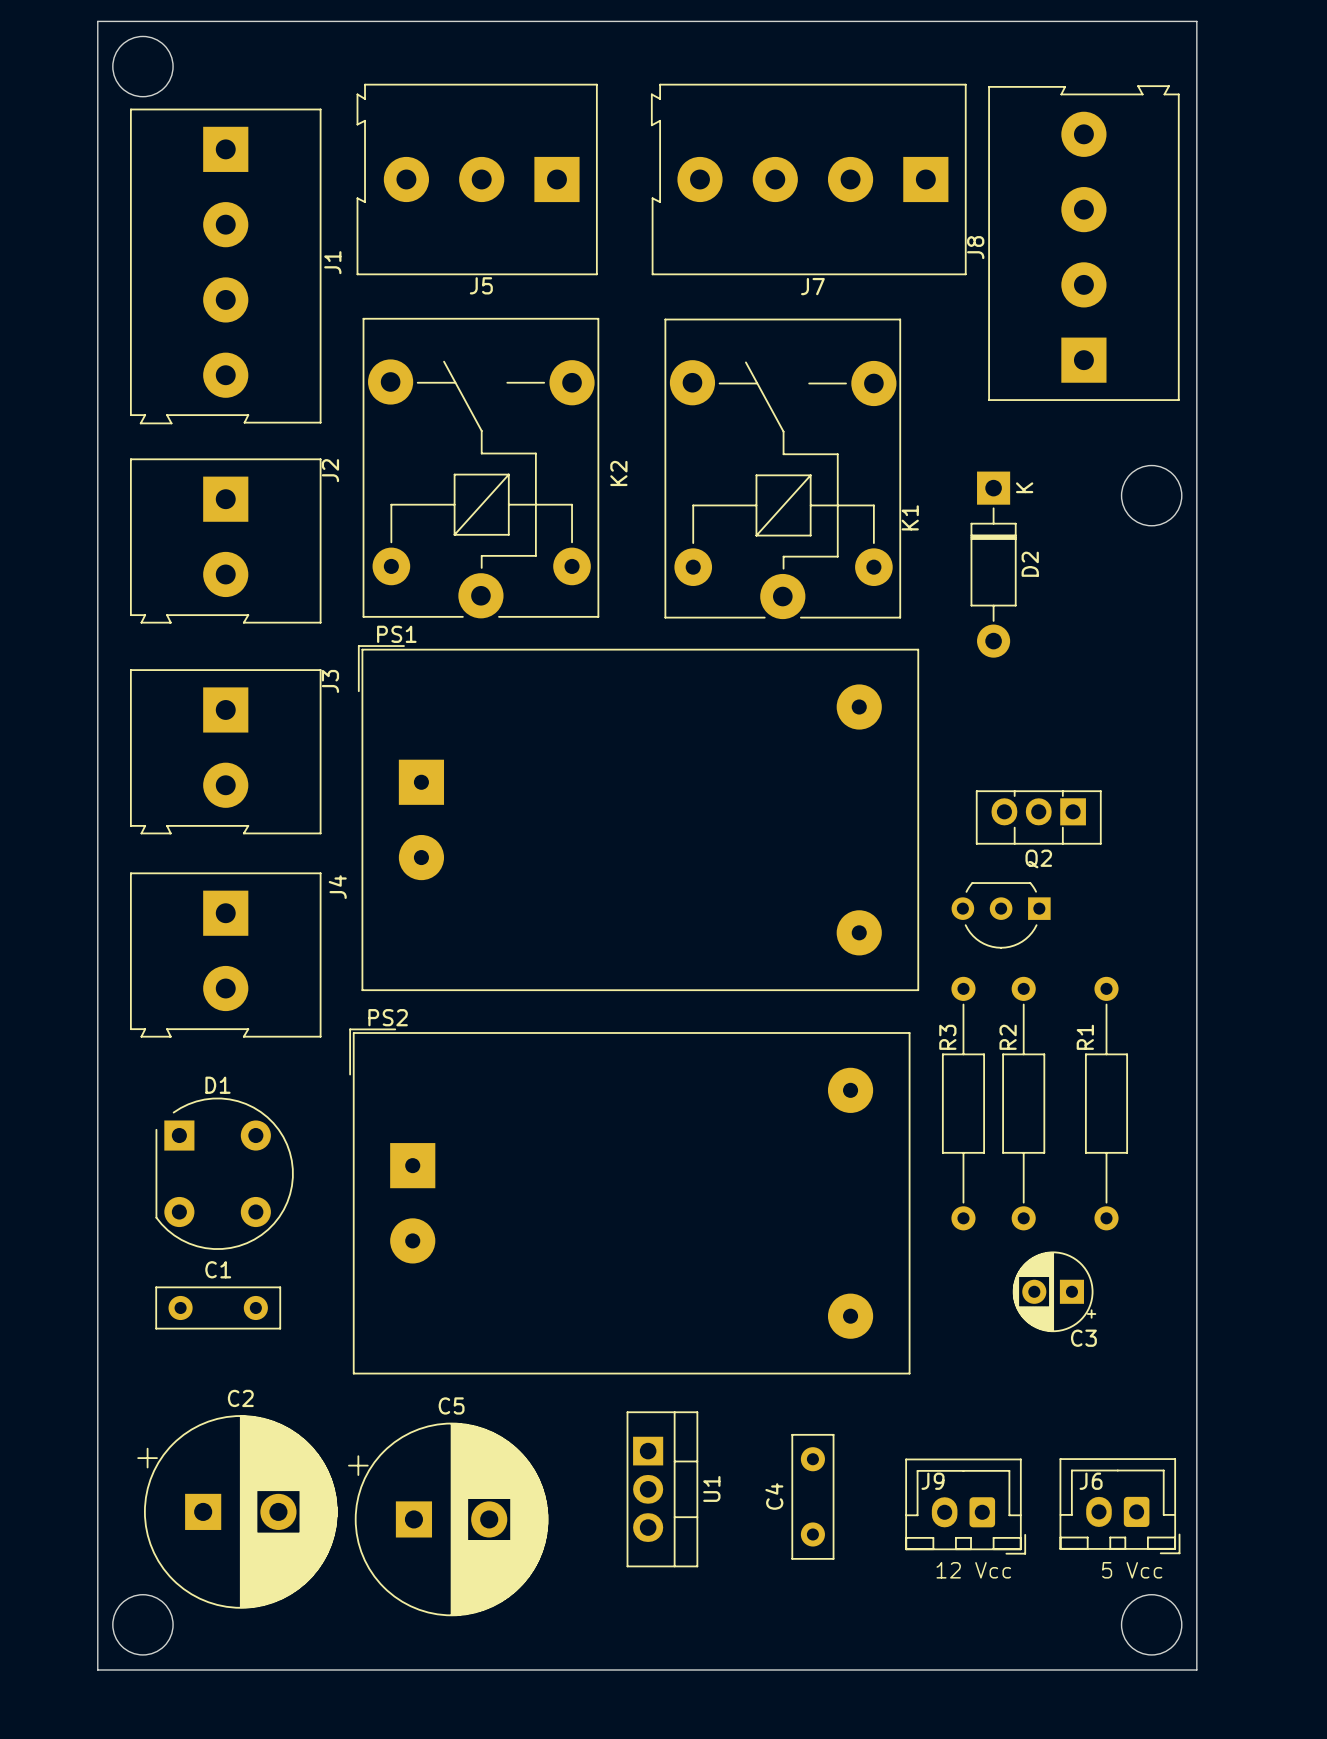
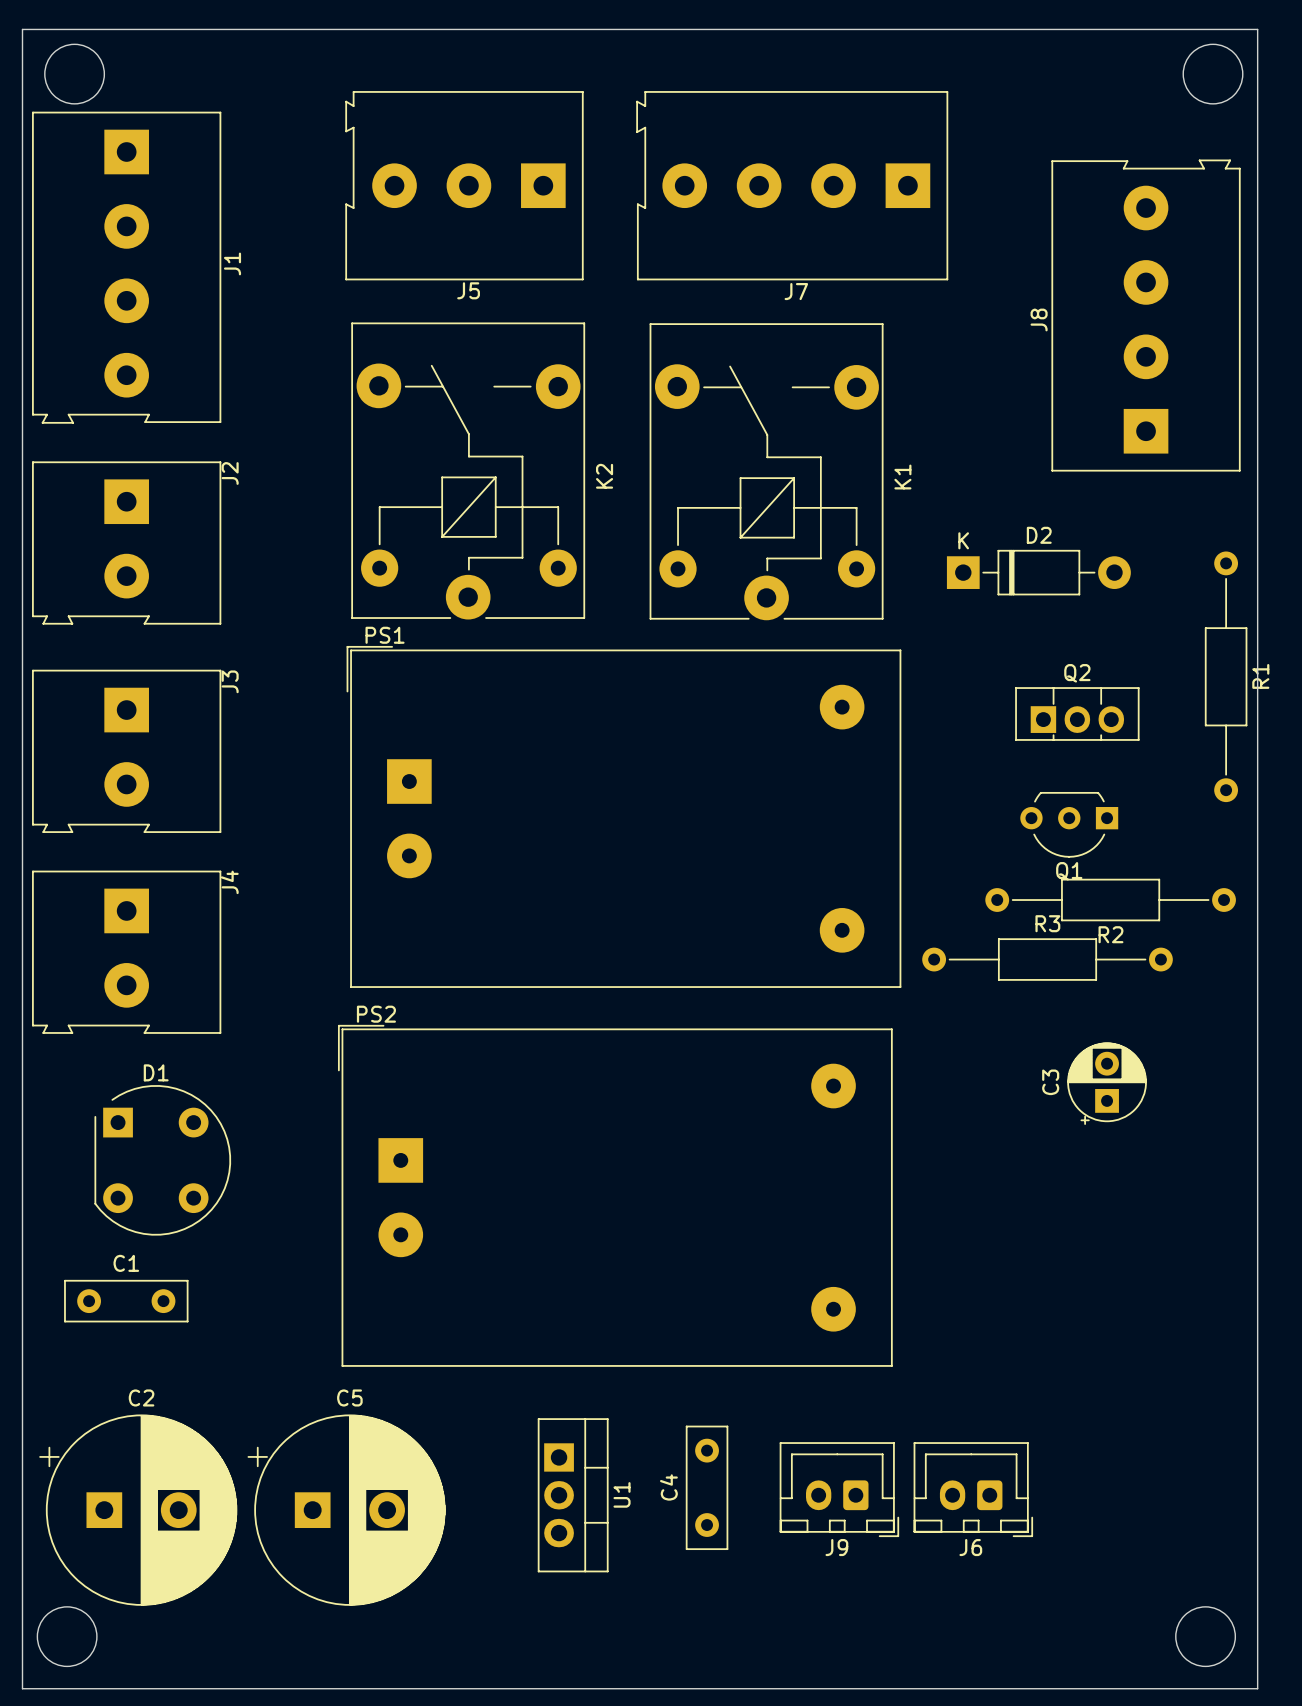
board edge: (97, 21) (97, 1670) (1196, 1670) (1196, 21) -> (89, 29) (22, 29) (22, 1688) (1257, 1688) (1257, 29) (1175, 29)
round board edge: none -> [1182, 43, 1244, 105]
round board edge position: (142, 66) -> (74, 74)
J8 position: (1083, 243) -> (1146, 315)
J1 position: (225, 266) -> (126, 267)
round board edge: [1121, 465, 1183, 527] -> none
K1 name position: K1 (910, 517) -> K1 (902, 477)
J2 position: (225, 540) -> (126, 543)
D2 rotation: 0° (993, 564) -> 90° counterclockwise (1038, 572)
J3 position: (225, 751) -> (126, 751)
Q2 rotation: 0° (1038, 817) -> 180° (1077, 713)
Q2 position: (1038, 817) -> (1077, 713)
Q1: none -> (1069, 824)
J4 name position: J4 (337, 887) -> J4 (229, 882)
part: (1001, 915) -> none
J4 position: (225, 955) -> (126, 952)
R3 name position: R3 (947, 1037) -> R3 (1047, 923)
R2 name position: R2 (1008, 1037) -> R2 (1110, 934)
R1 name position: R1 (1085, 1037) -> R1 (1260, 676)
R3 rotation: 0° (963, 1103) -> 90° clockwise (1047, 959)
R3 position: (963, 1103) -> (1047, 959)
R2 rotation: 0° (1023, 1103) -> 90° clockwise (1110, 900)
R2 position: (1023, 1103) -> (1110, 900)
R1 position: (1106, 1103) -> (1226, 676)
D1 position: (224, 1173) -> (162, 1160)
C3 rotation: 0° (1054, 1291) -> 90° clockwise (1107, 1083)
C3 position: (1054, 1291) -> (1107, 1083)
C1 position: (218, 1307) -> (126, 1301)
C3 name position: C3 (1083, 1338) -> C3 (1050, 1082)
J9 name position: J9 (933, 1481) -> J9 (836, 1547)
J6 name position: J6 (1091, 1481) -> J6 (970, 1547)
U1 position: (662, 1489) -> (573, 1495)
C4 position: (812, 1496) -> (707, 1487)
J9 position: (965, 1506) -> (839, 1489)
J6 position: (1119, 1506) -> (973, 1489)
C2 position: (237, 1511) -> (138, 1510)
C5 position: (448, 1519) -> (346, 1510)
text: 12 Vcc (973, 1570) -> none
text: 5 Vcc (1132, 1570) -> none
round board edge position: (142, 1624) -> (67, 1636)
round board edge position: (1151, 1624) -> (1205, 1636)

